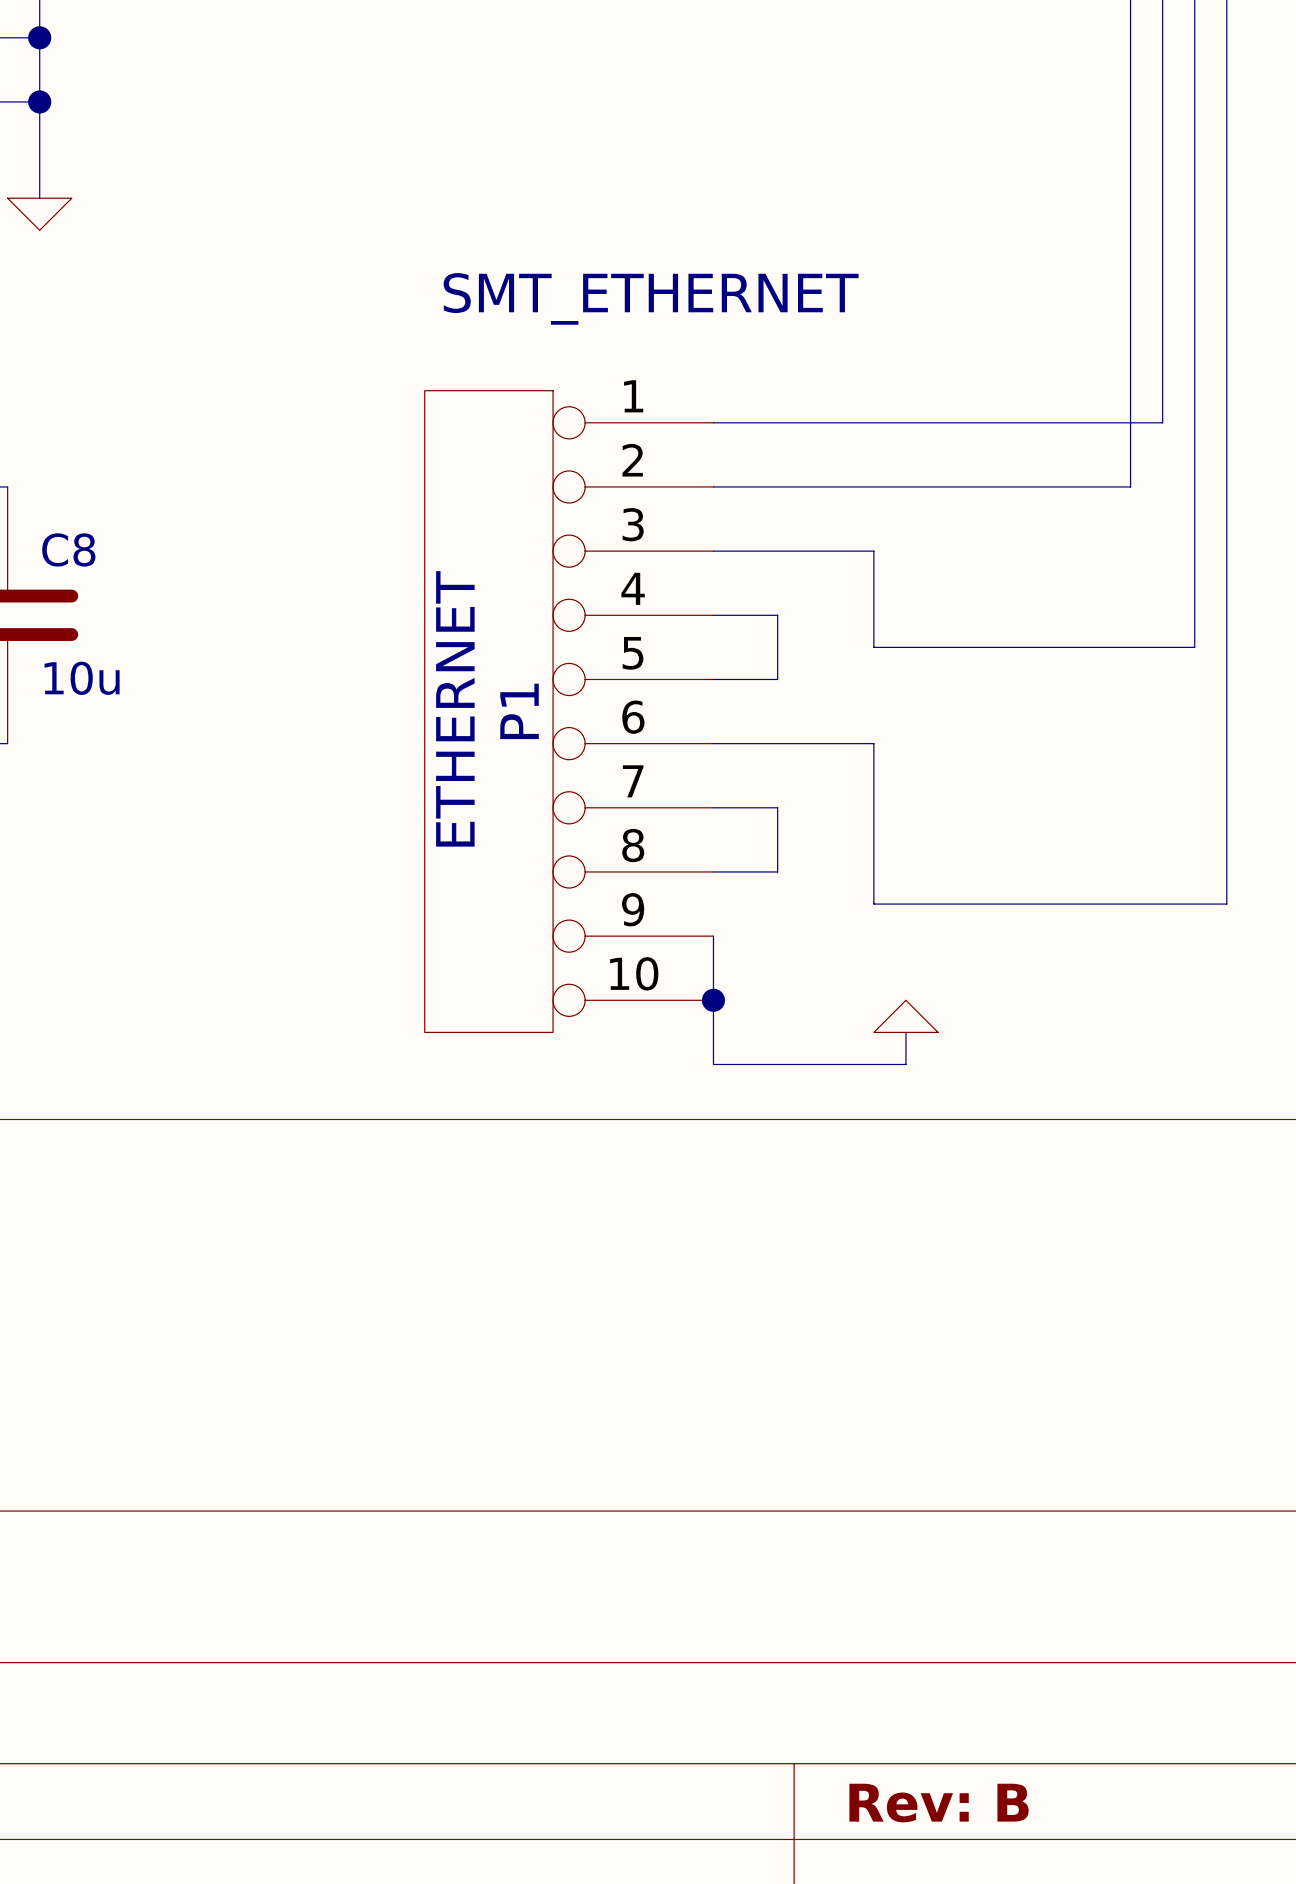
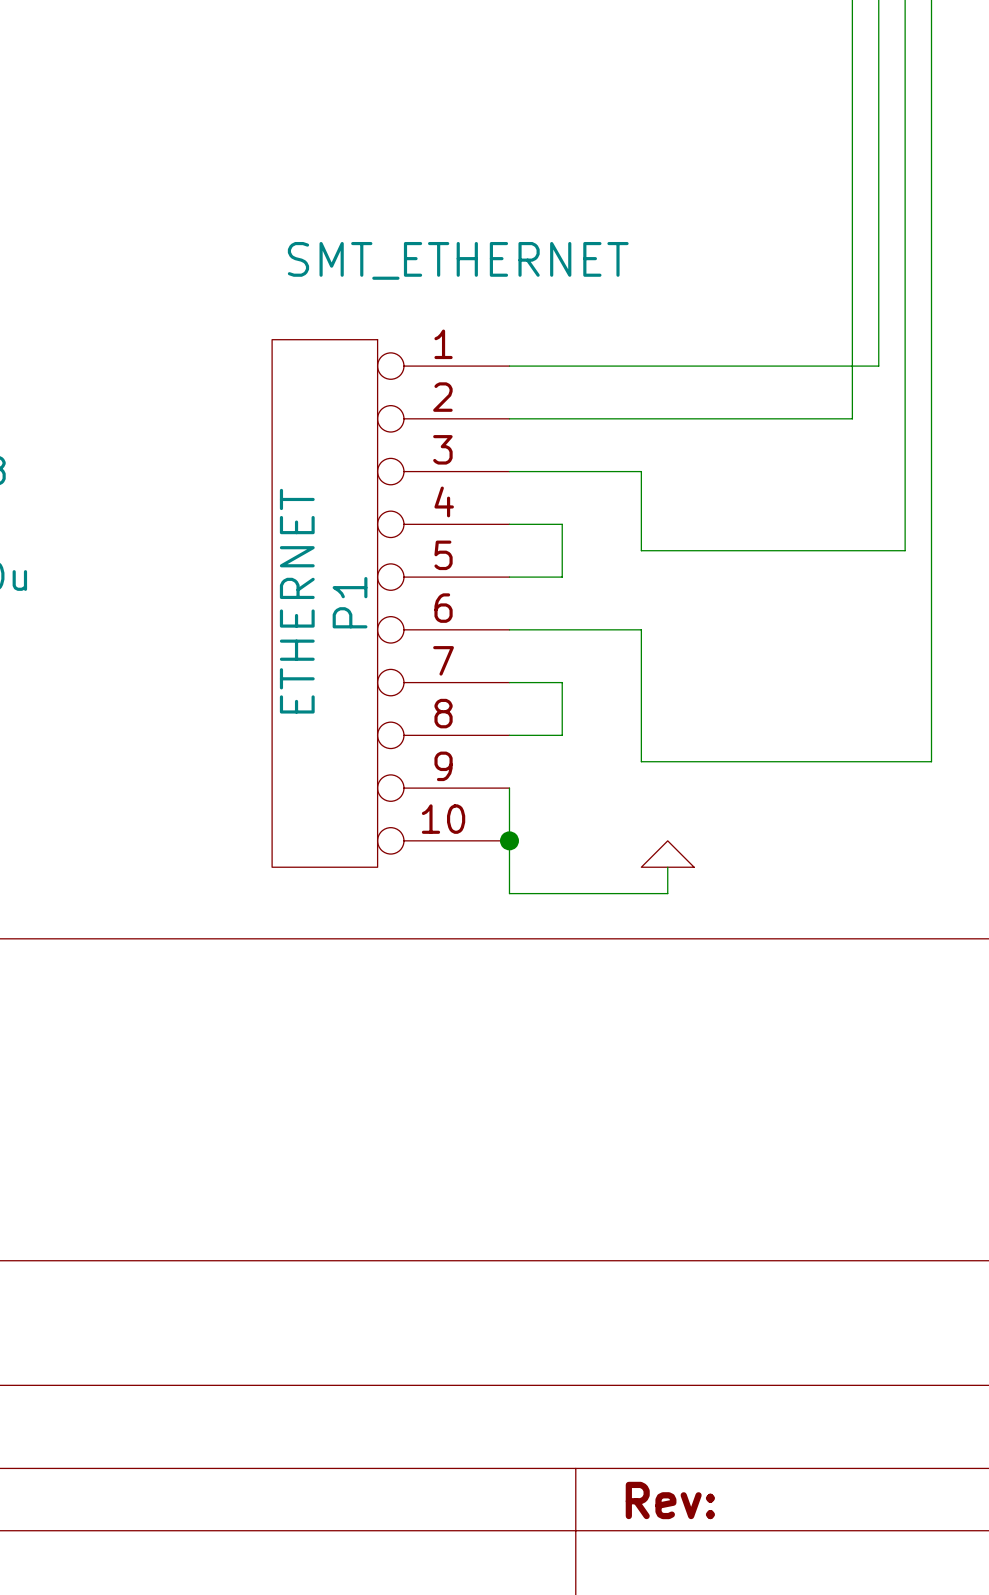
title block: Rev: B (939, 1803) -> Rev: (670, 1500)

